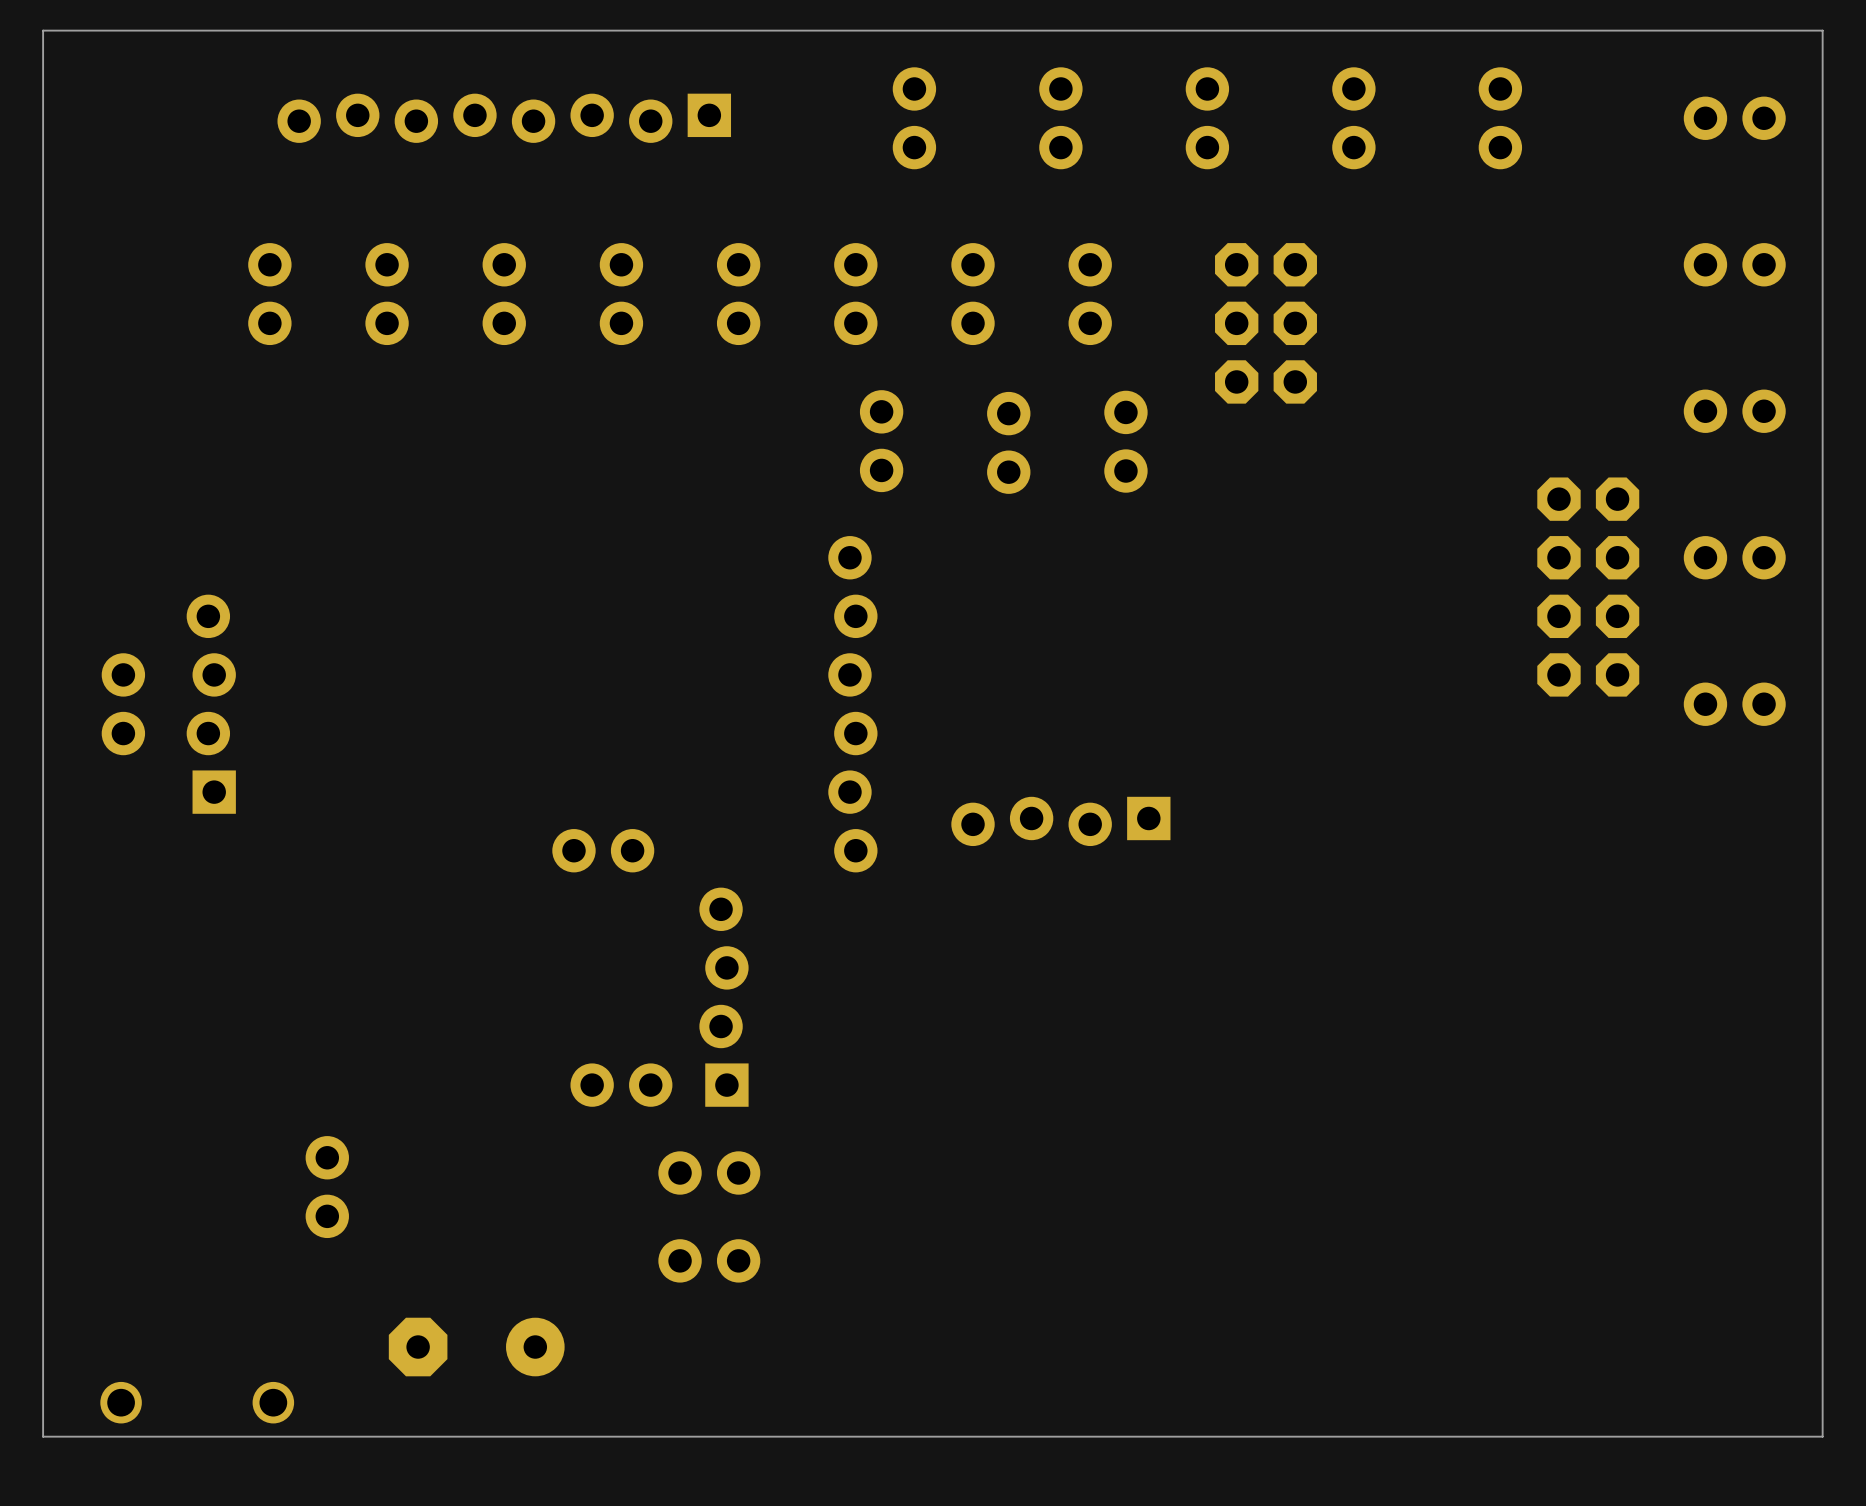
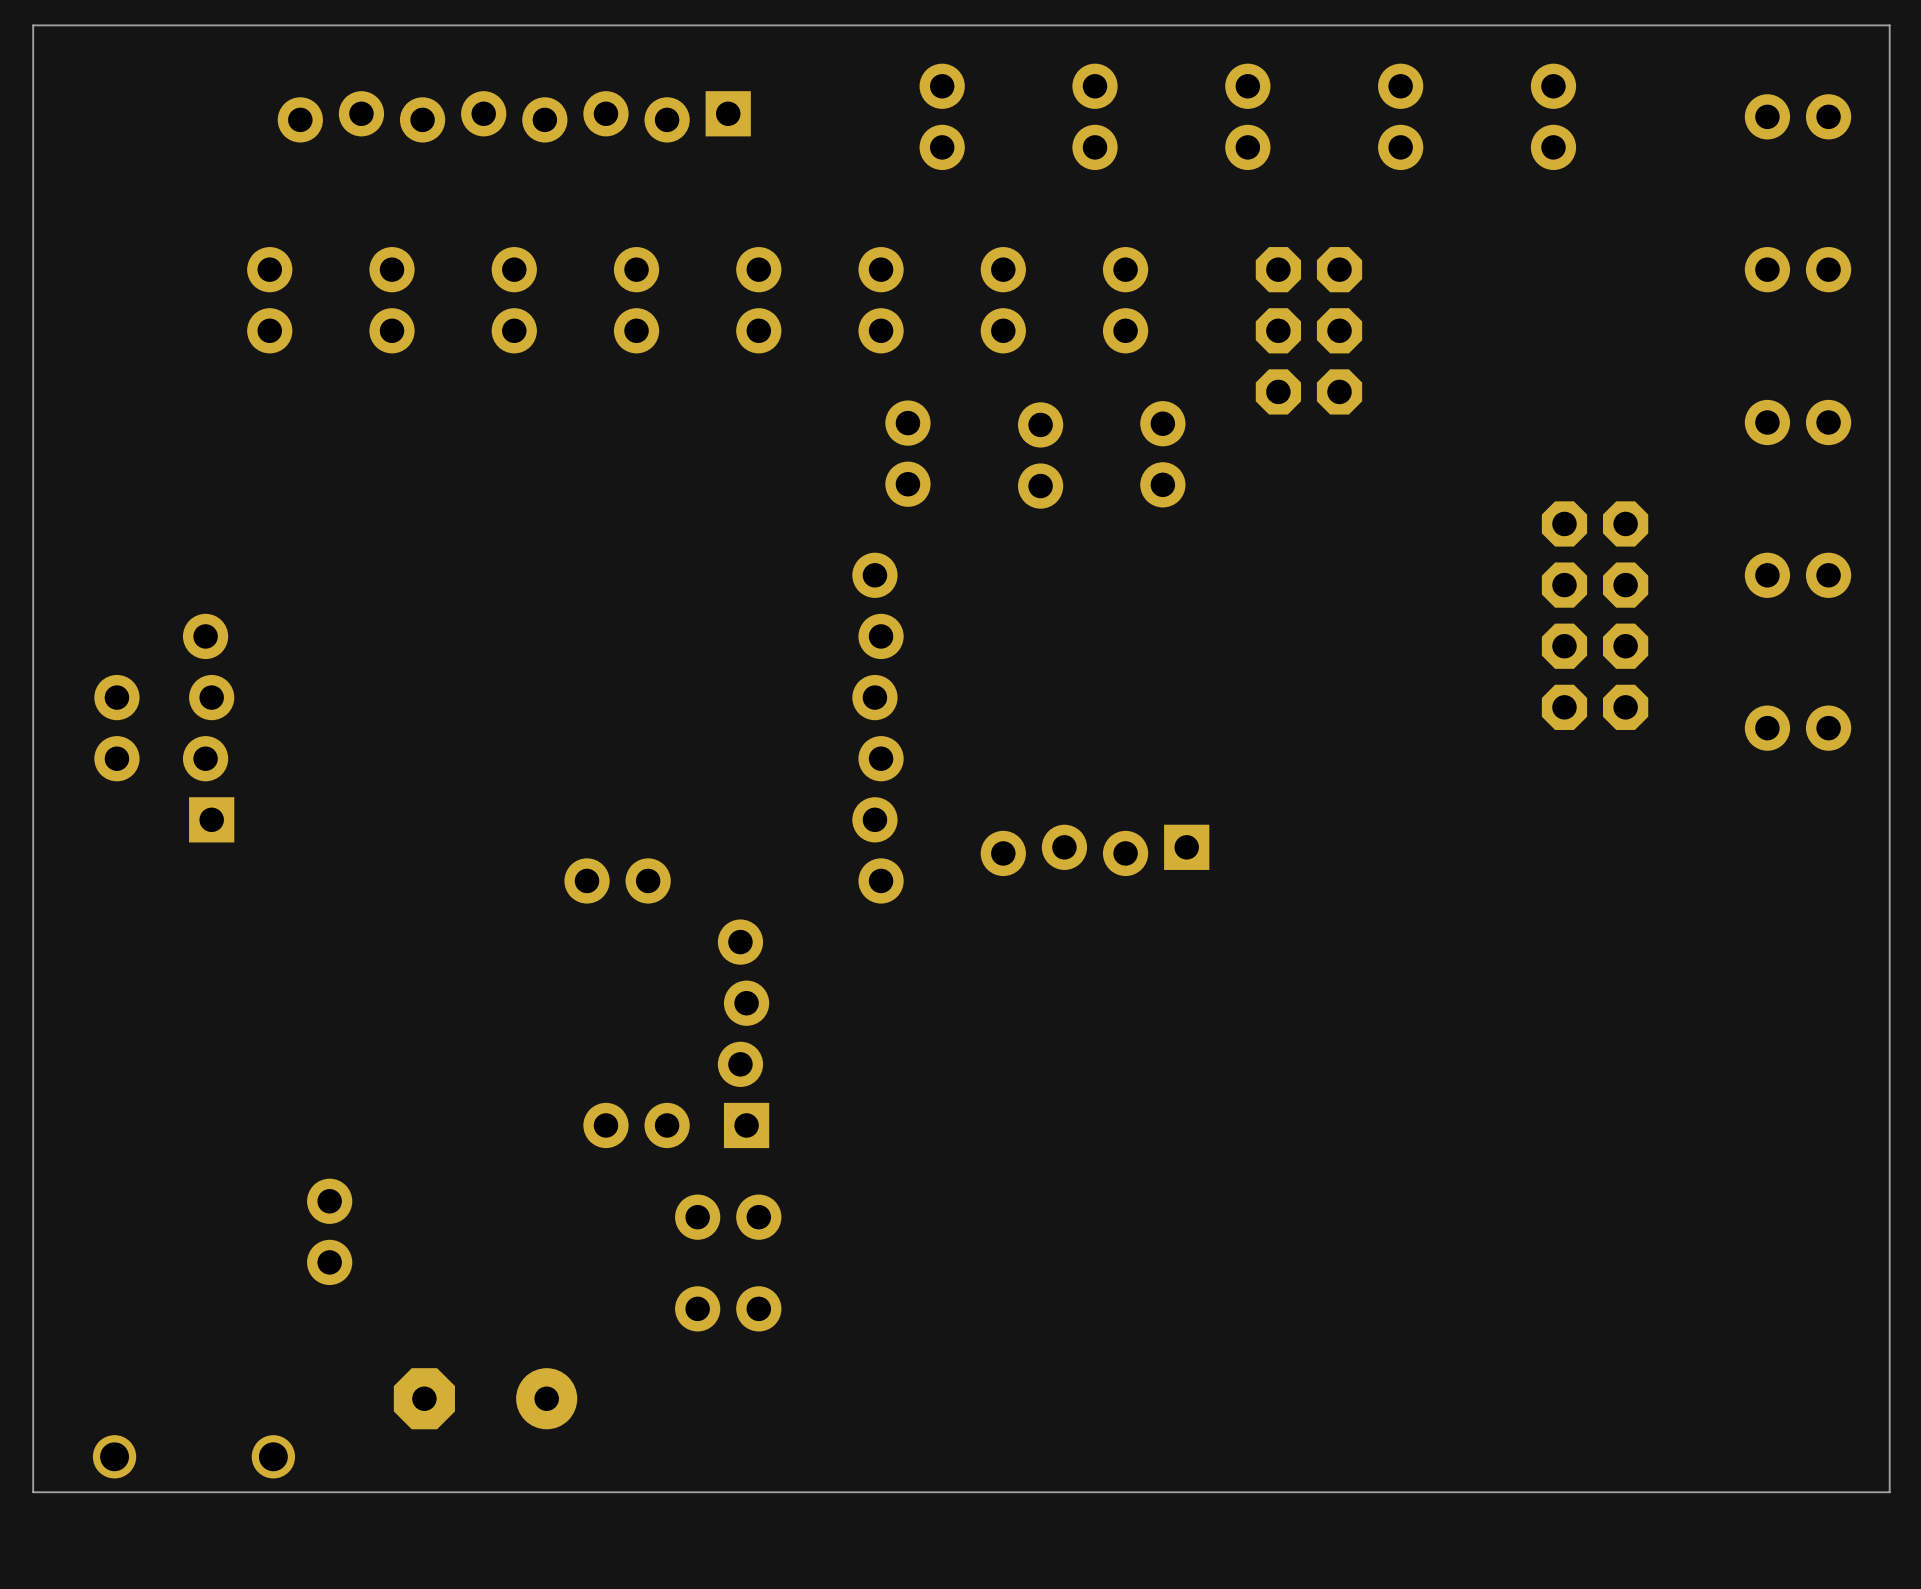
part position: (1588, 587) -> (1595, 615)

